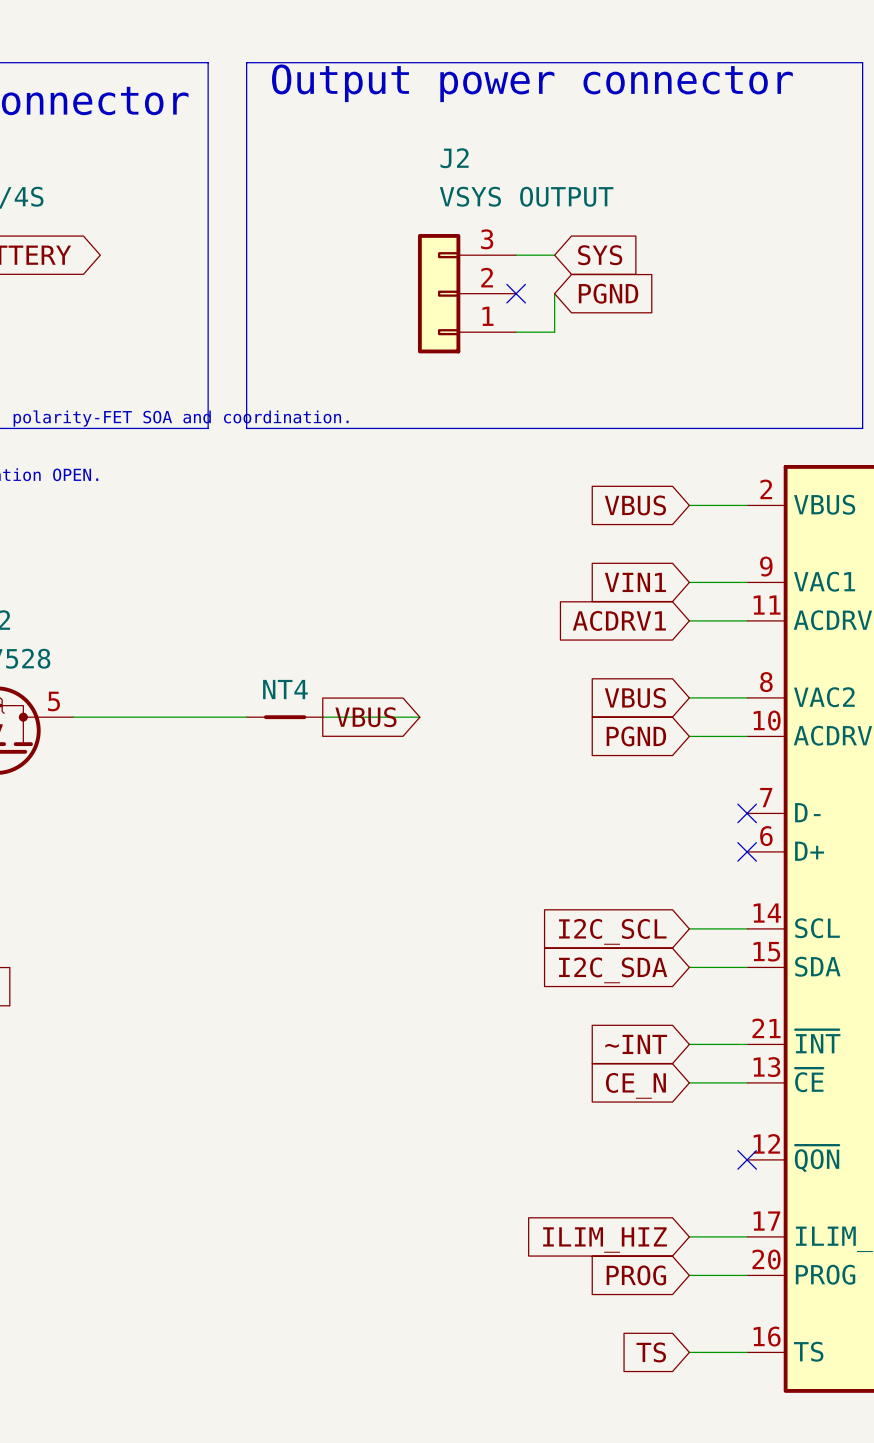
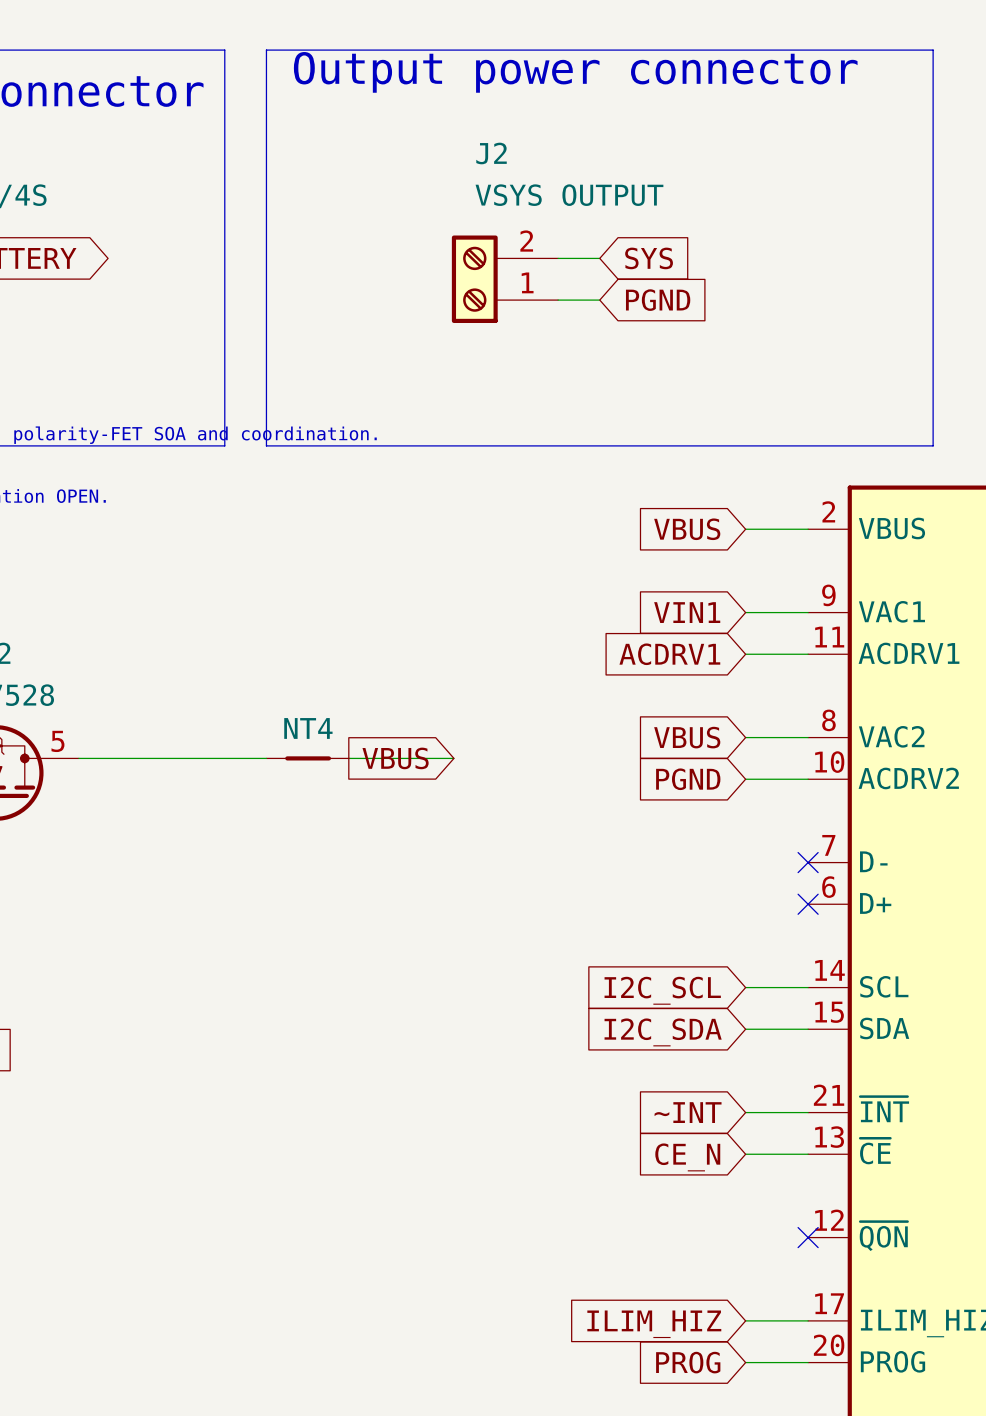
J2 symbol: [417, 234, 517, 354] -> [451, 235, 559, 324]
no-connect mark: (516, 293) -> none
wire: (554, 293) (554, 332) (516, 332) -> (599, 300) (558, 300)

